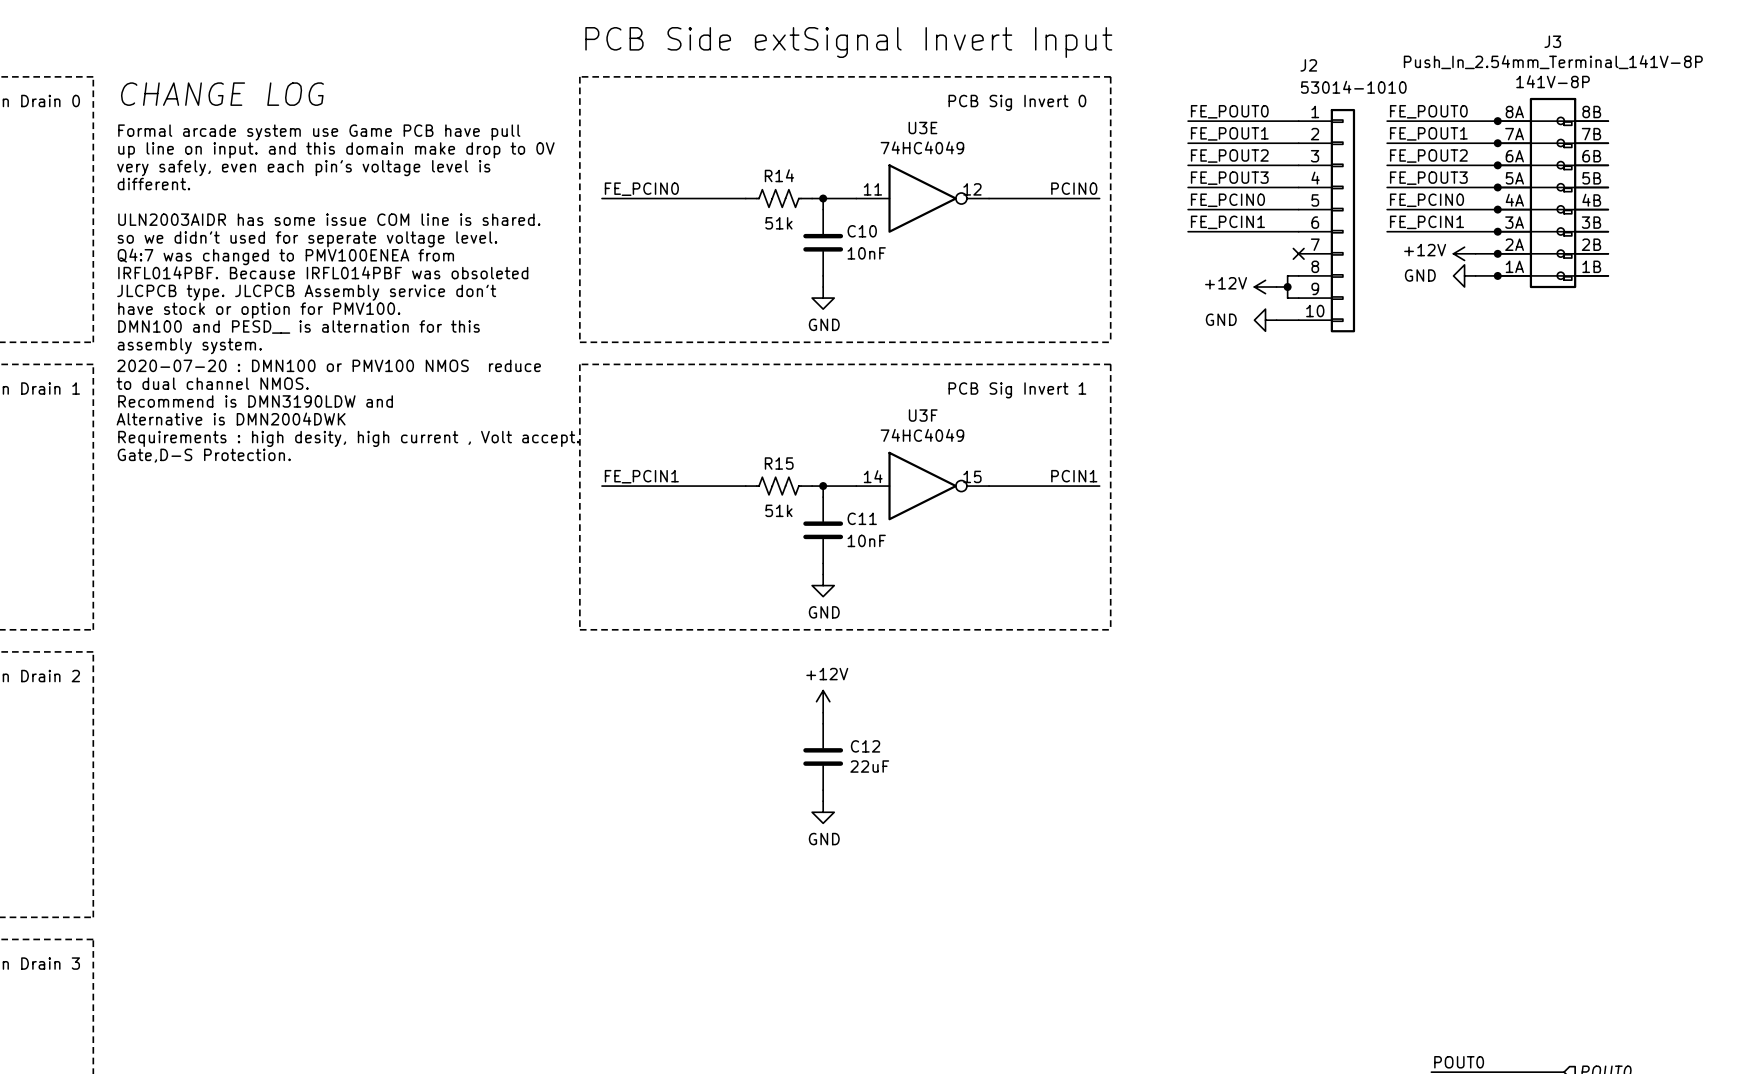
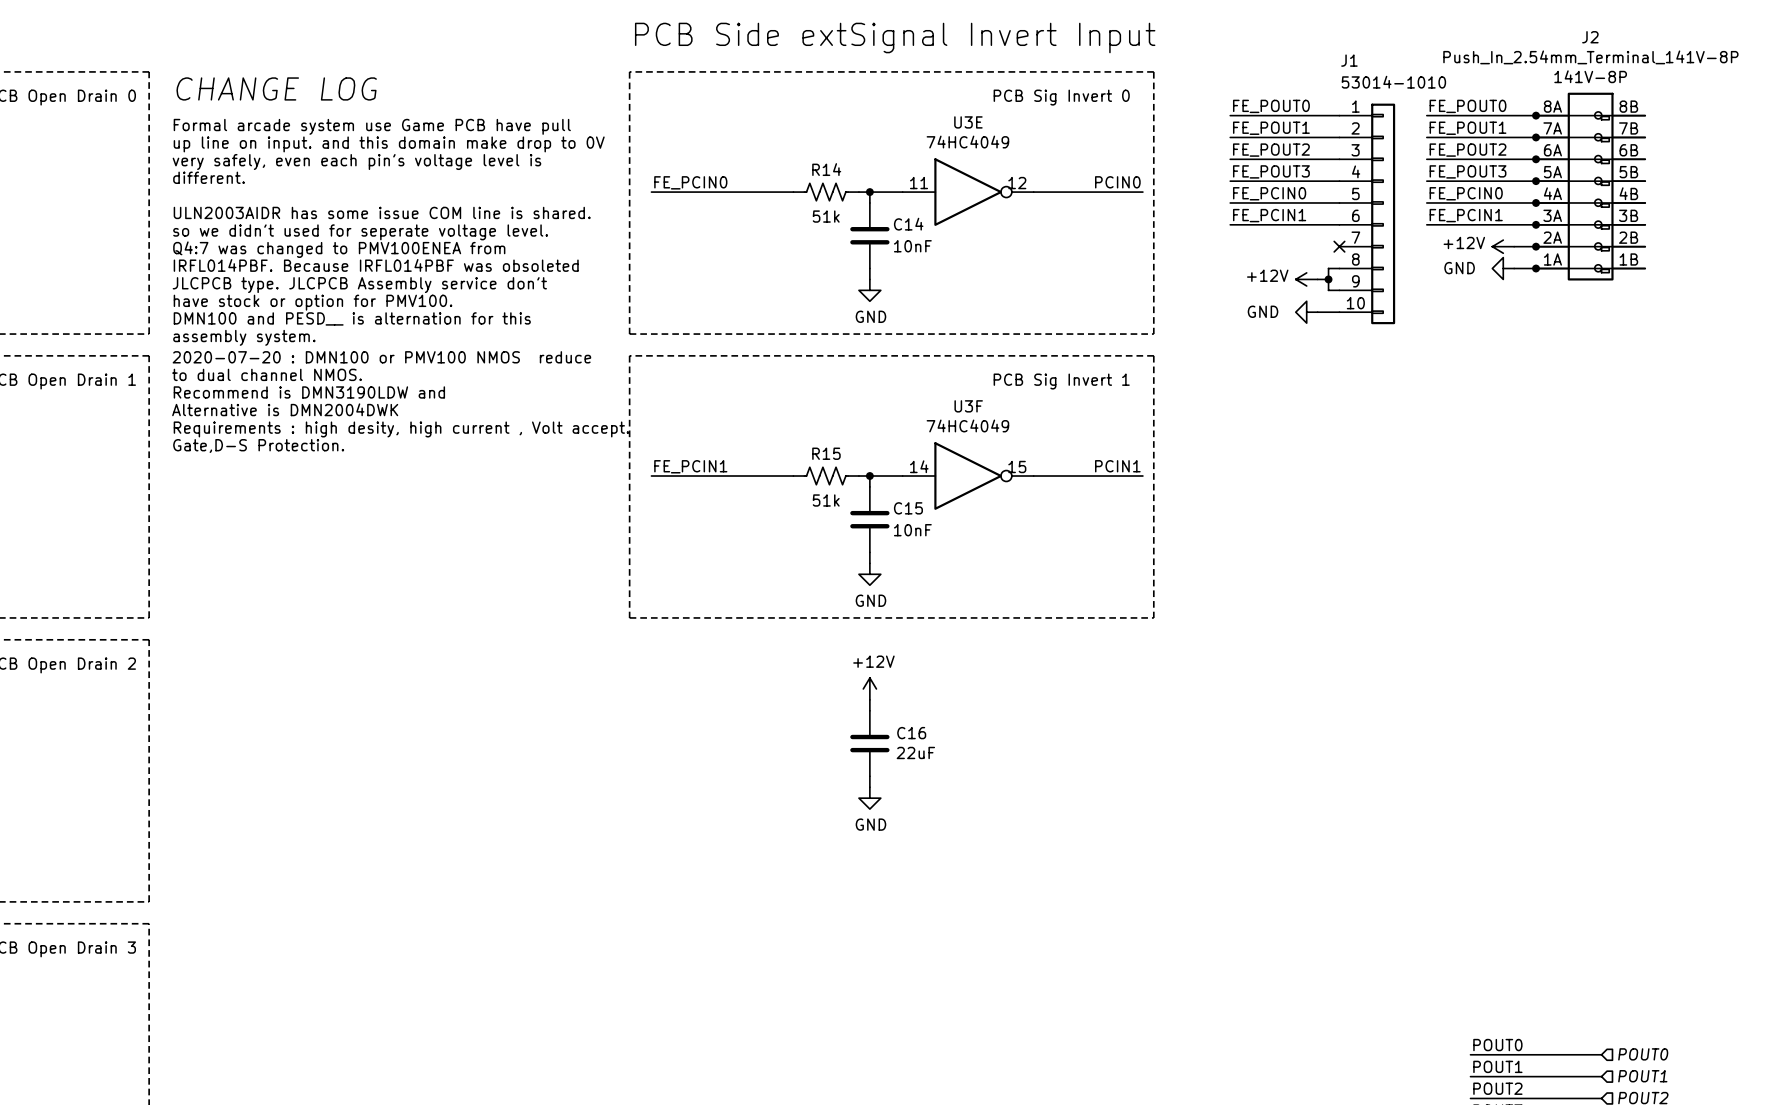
J3 name: J3 (1552, 41) -> J2 (1590, 37)
J2 name: J2 (1308, 65) -> J1 (1349, 60)
C10 name: C10 (862, 231) -> C14 (908, 224)
C11 name: C11 (862, 518) -> C15 (908, 508)
C12 name: C12 (865, 746) -> C16 (911, 733)

